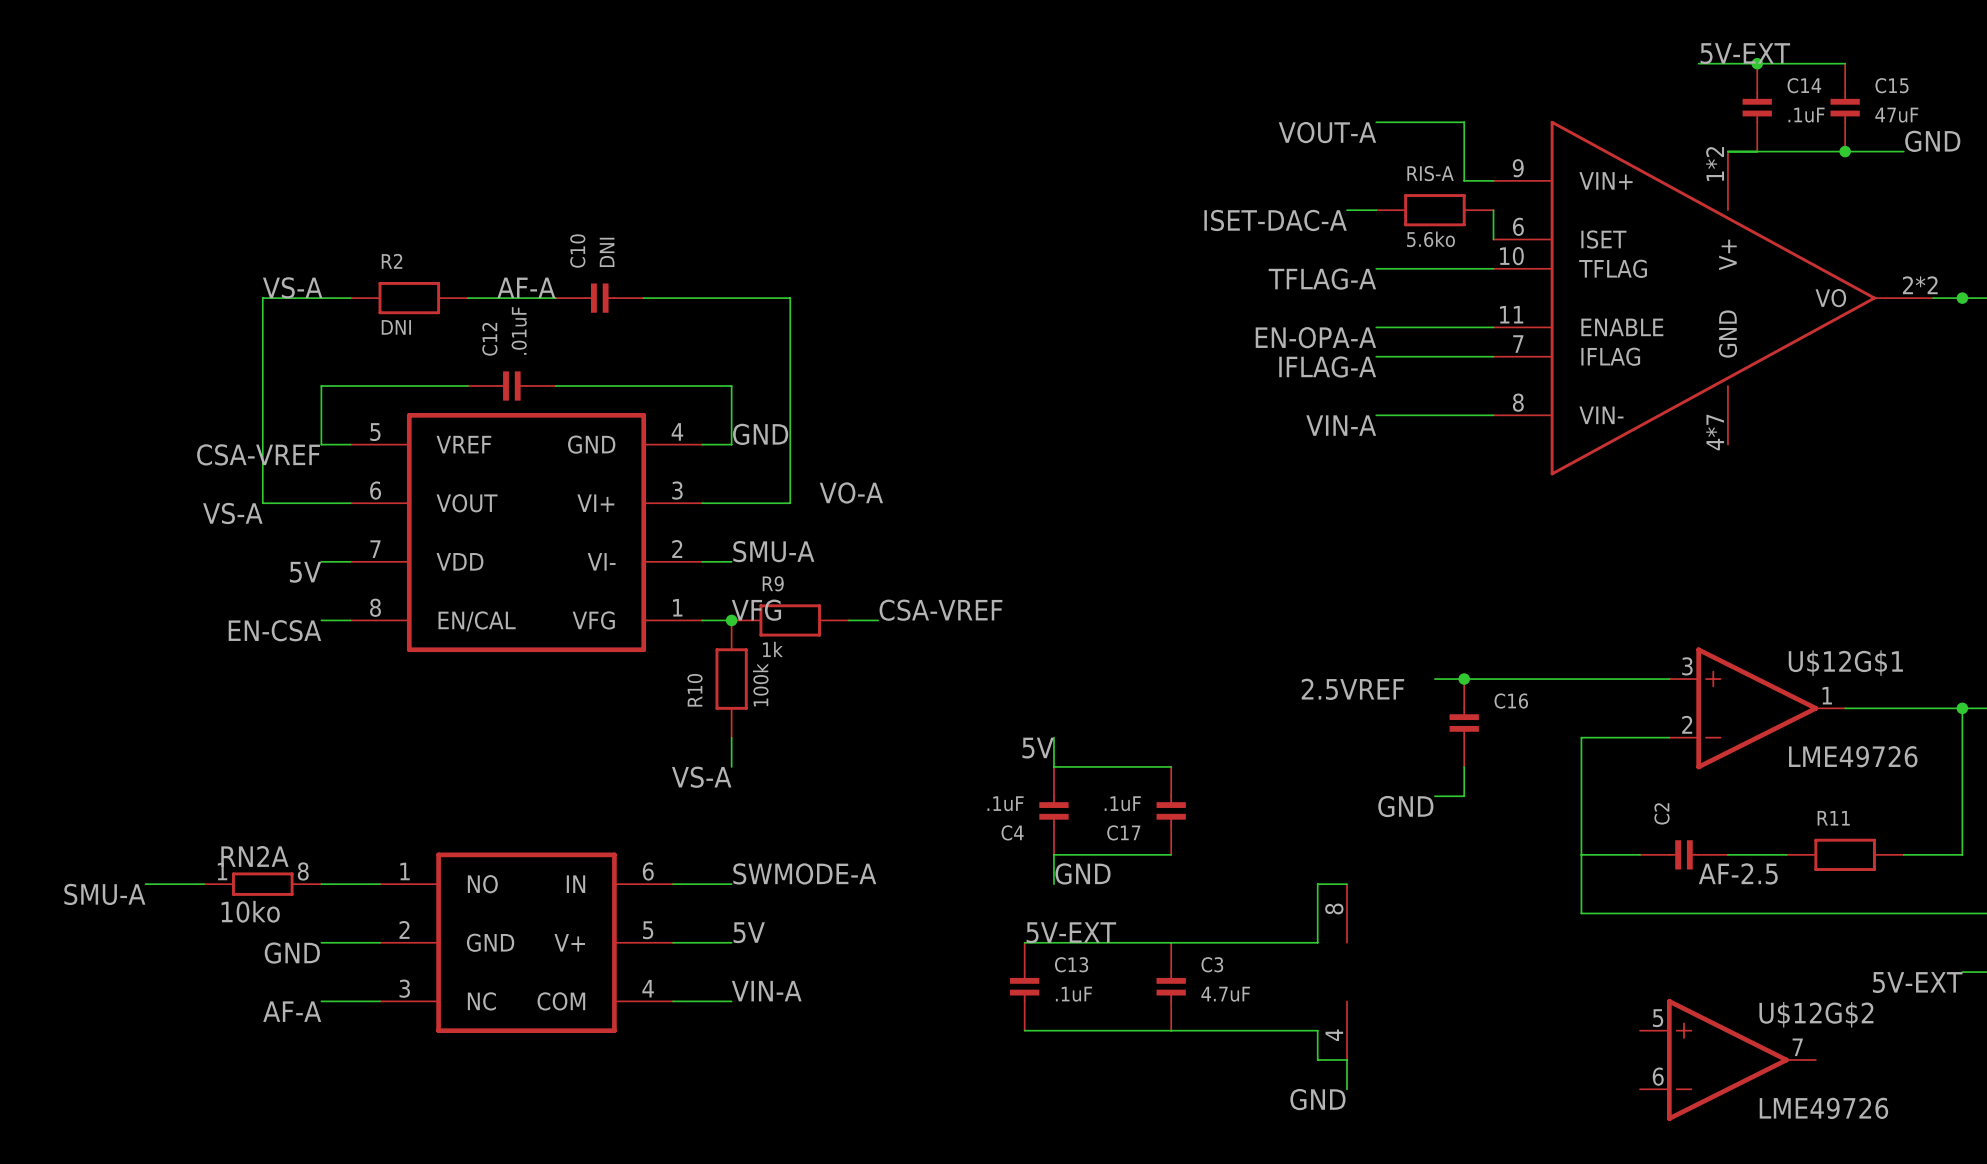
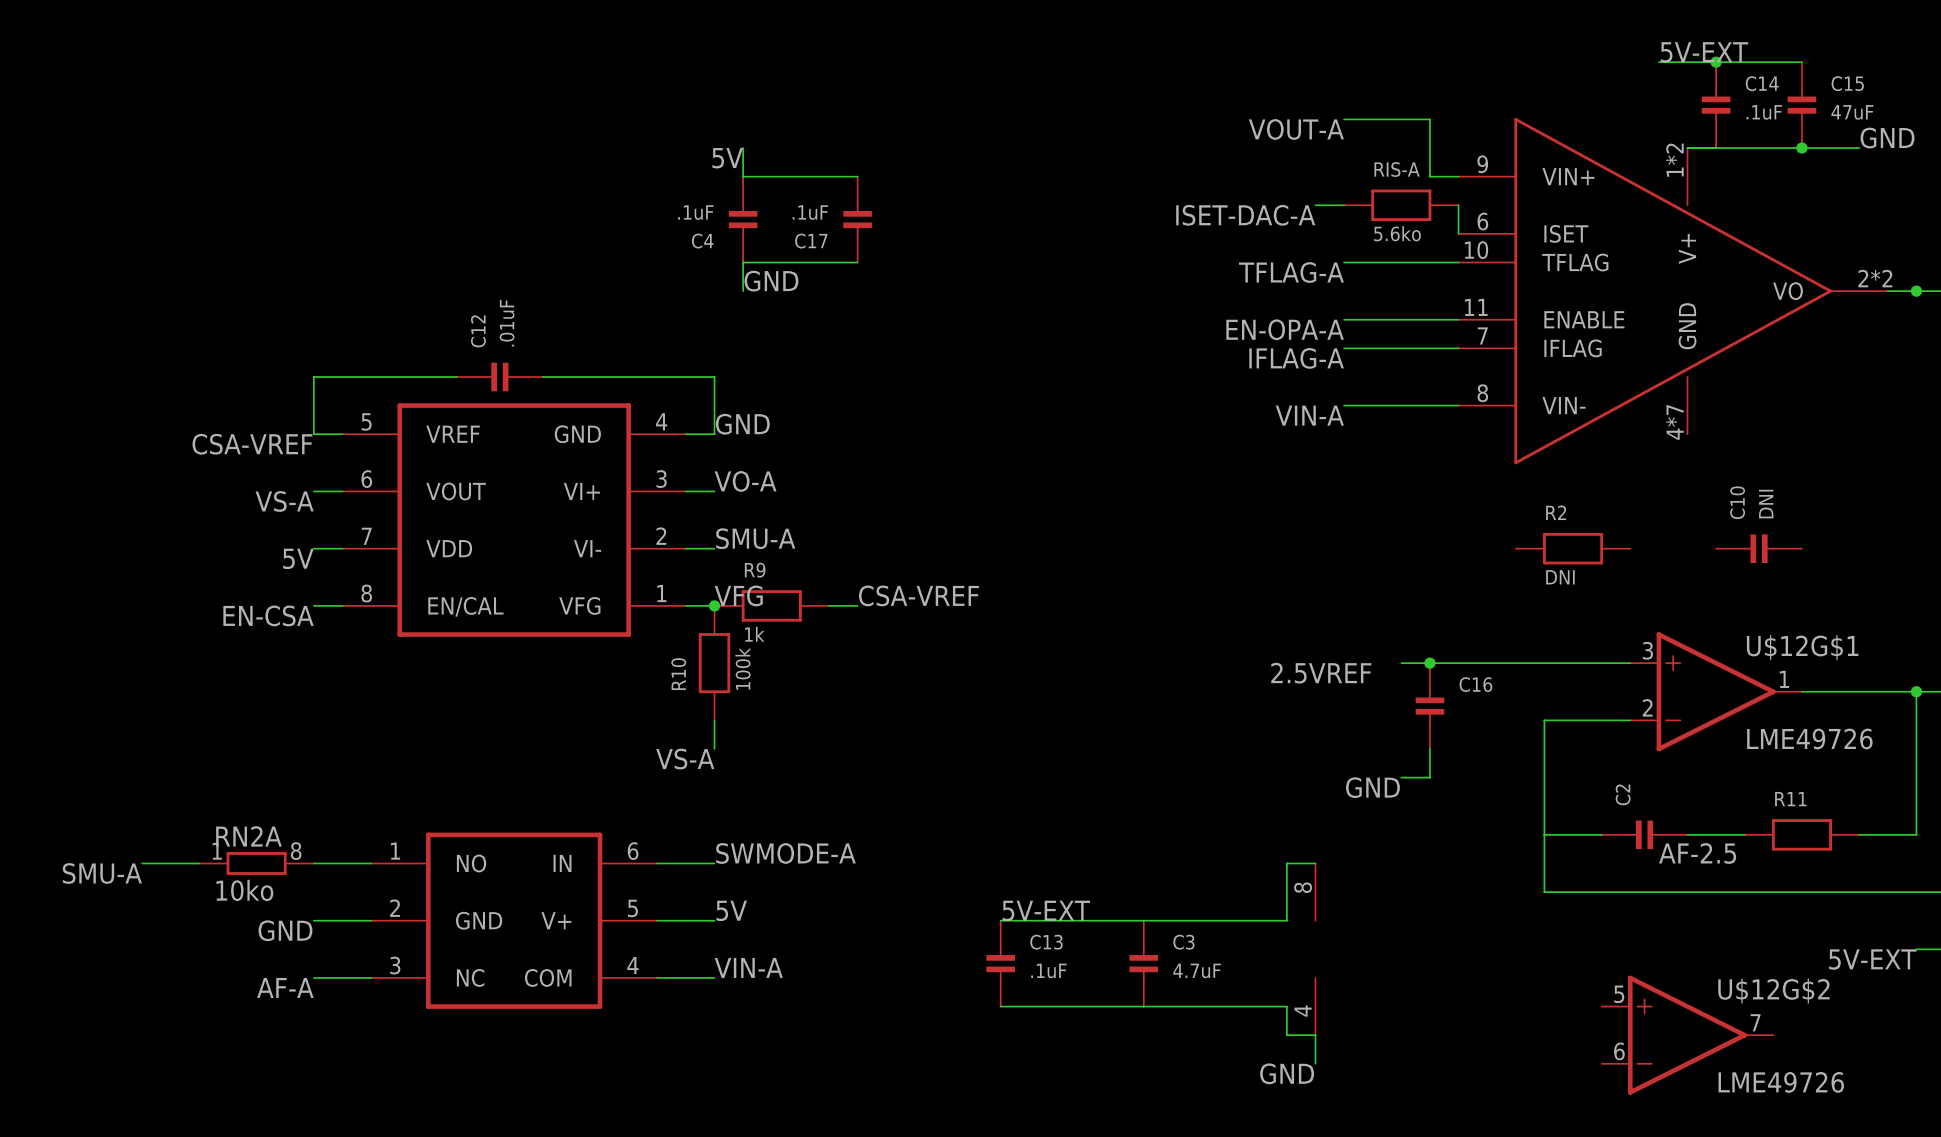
wire: none -> (743, 148) (743, 176) (857, 176)
label: none -> 5V (727, 158)
wire: none -> (857, 262) (743, 262) (743, 291)
label: VS-A (292, 287) -> none
label: AF-A (526, 287) -> none
label: none -> GND (771, 281)
wire: (350, 298) (262, 298) (262, 503) (321, 503) -> none
R2 position: (409, 298) -> (1573, 548)
wire: (467, 298) (555, 298) -> none
C10 position: (599, 298) -> (1759, 548)
wire: (643, 298) (790, 298) (790, 503) (731, 503) -> none
label position: VO-A (851, 492) -> VO-A (745, 481)
label position: VS-A (232, 513) -> VS-A (284, 501)
wire: (1053, 737) (1053, 766) (1171, 766) -> none
label: 5V (1038, 748) -> none
C4 position: (1053, 810) -> (743, 219)
C17 position: (1171, 810) -> (857, 219)
wire: (1171, 854) (1053, 854) (1053, 884) -> none
label: GND (1082, 873) -> none

